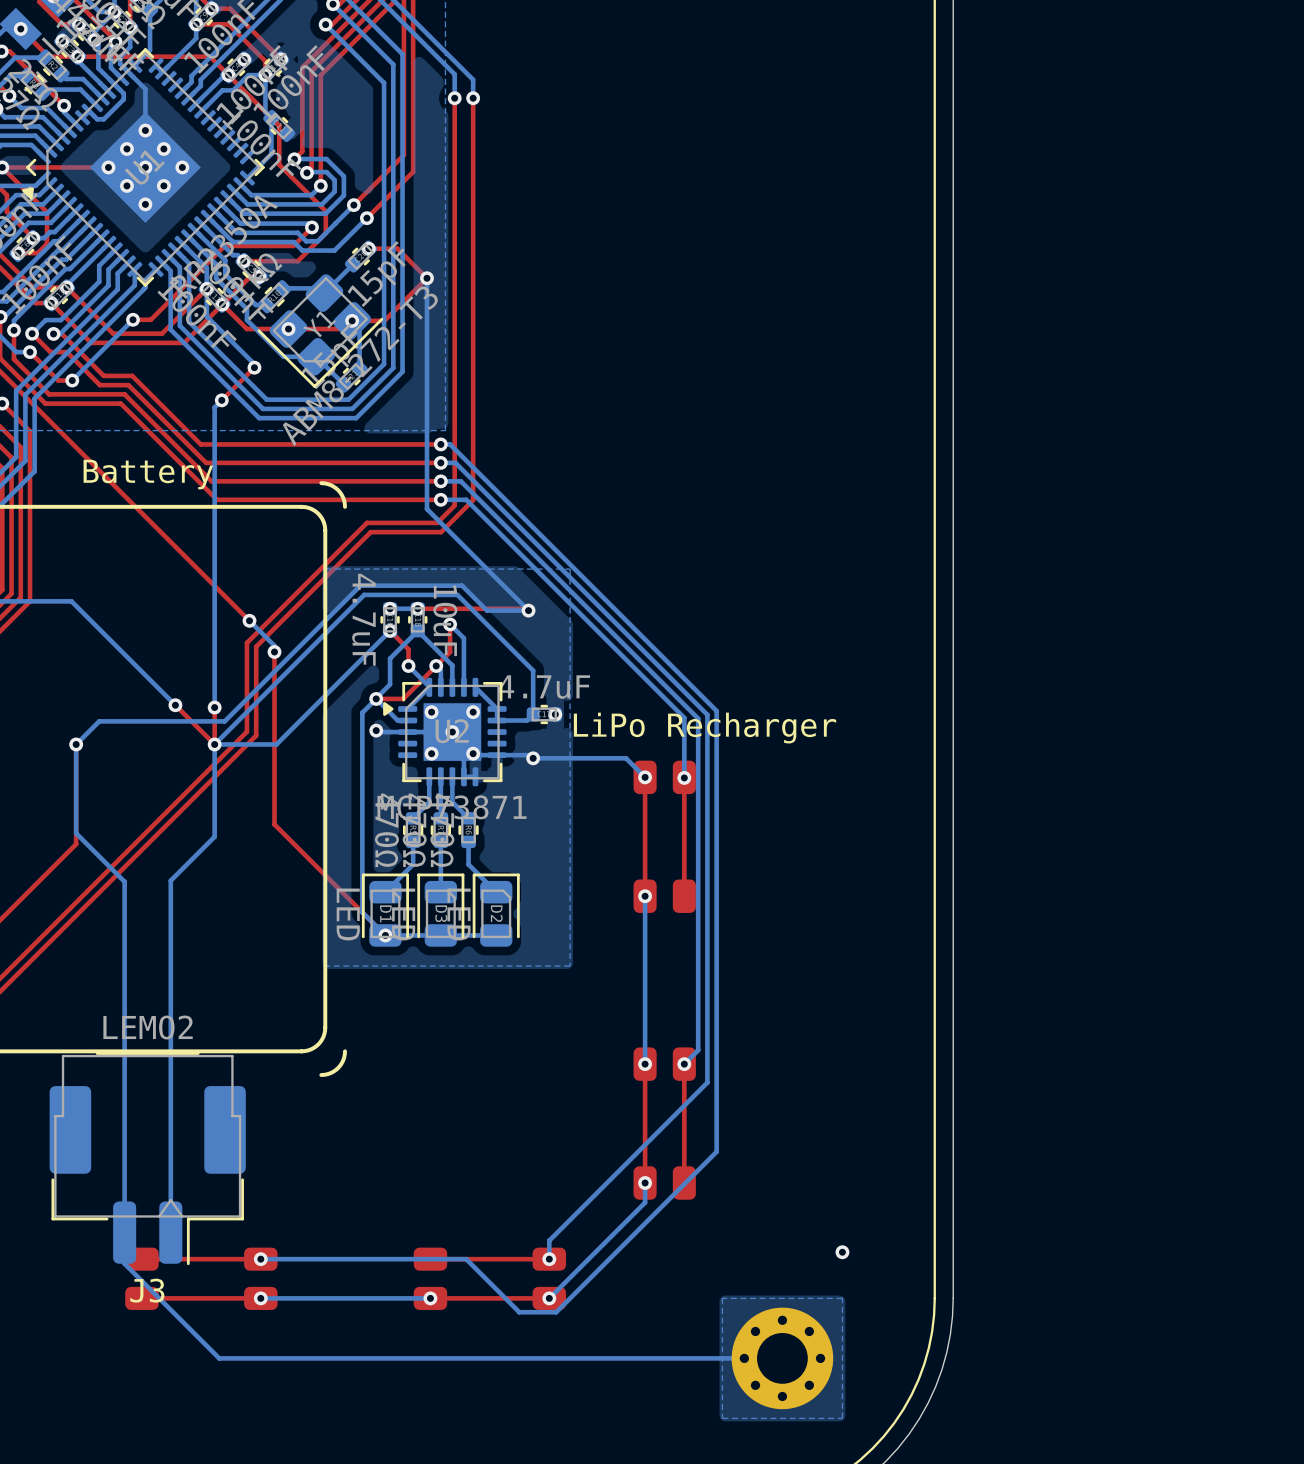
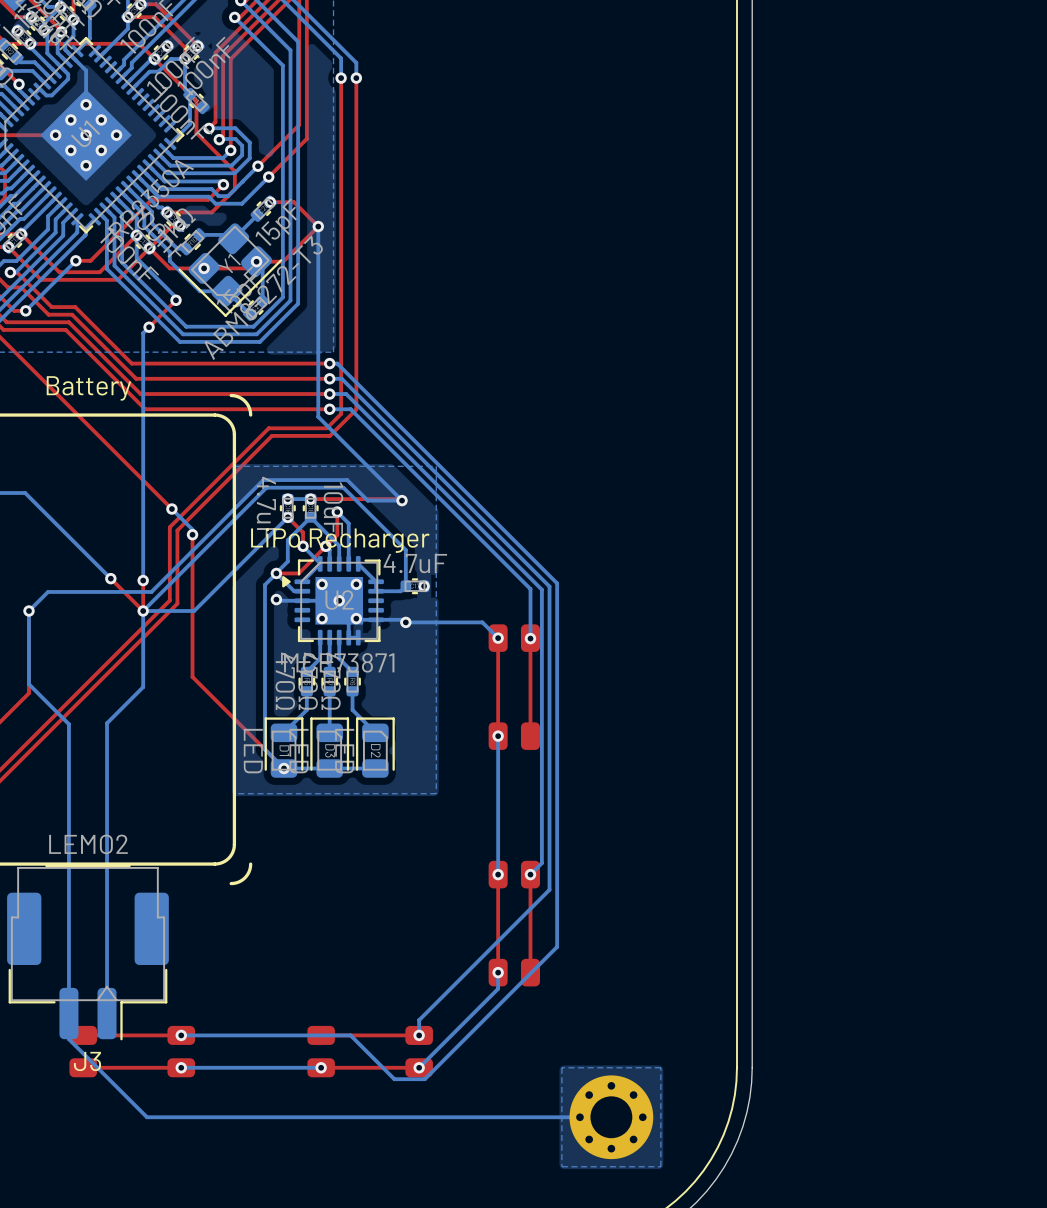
text position: LiPo Recharger (705, 728) -> LiPo Recharger (340, 540)
via: (842, 1252) -> none

